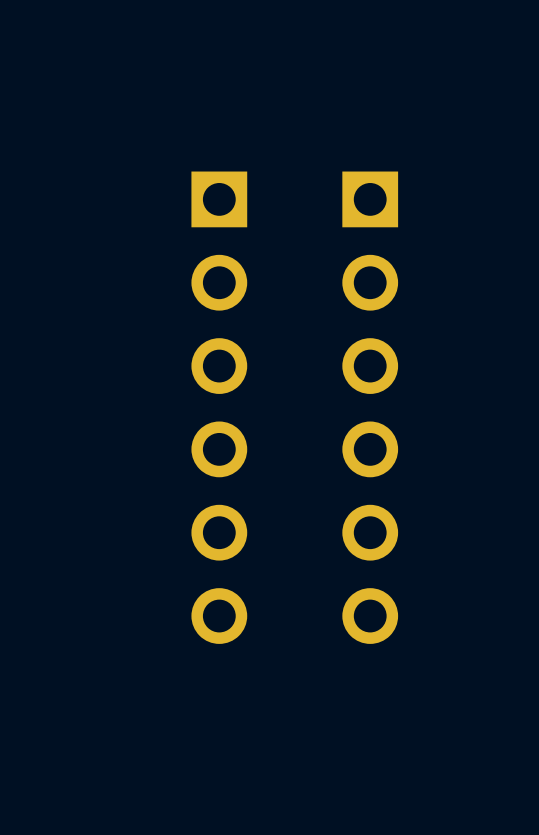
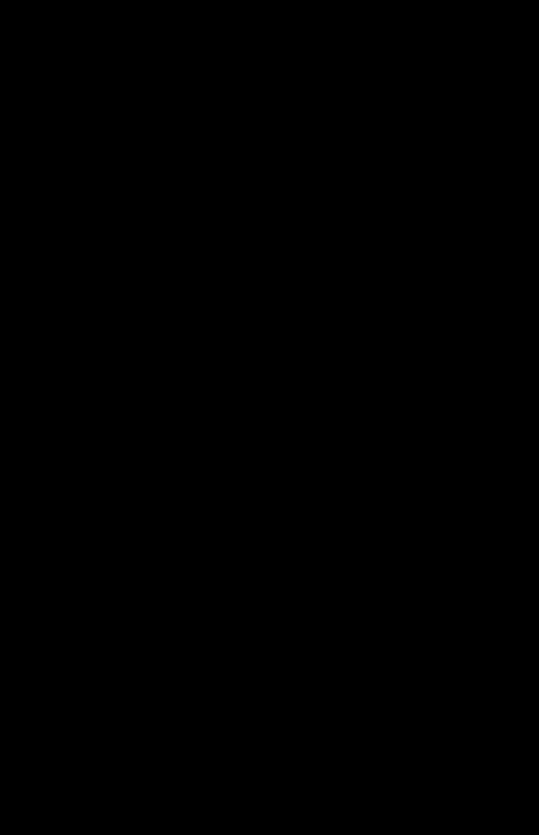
part: (219, 407) -> none
part: (370, 407) -> none

